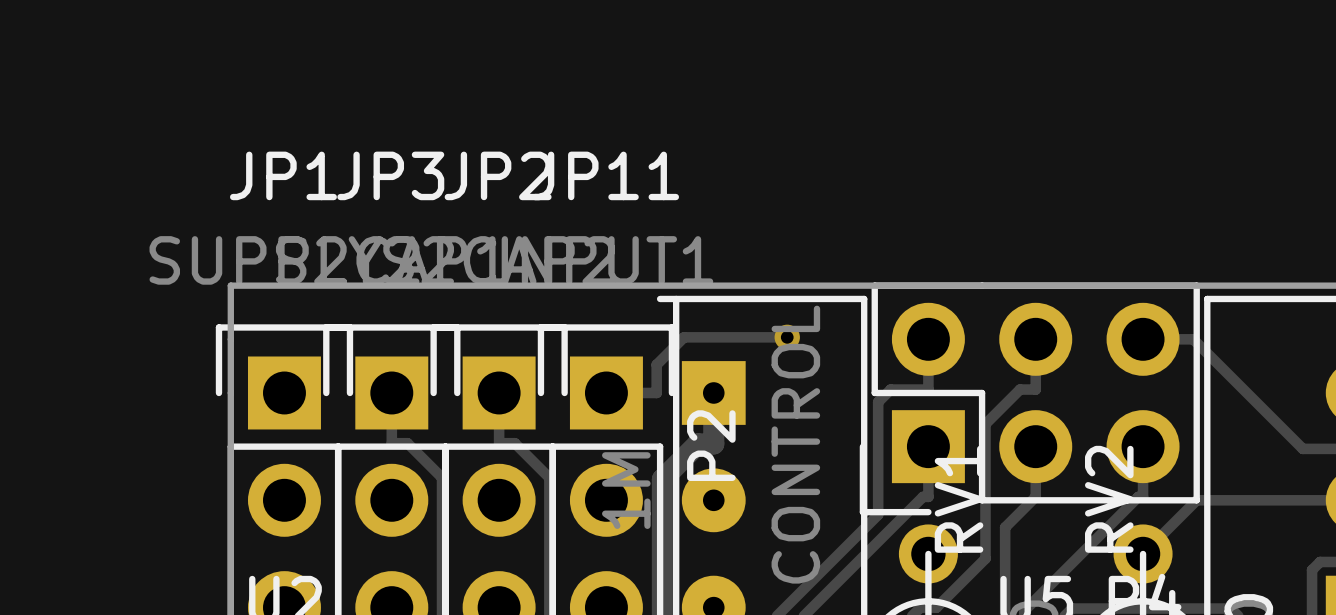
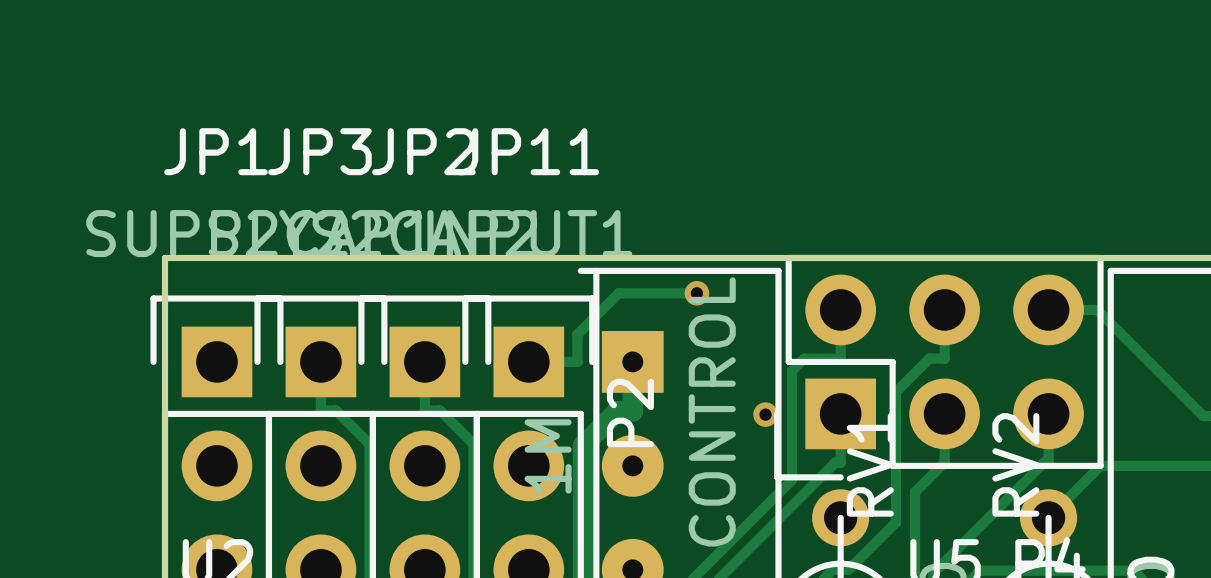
track: (684, 337) (787, 337) -> (603, 308) (618, 293) (696, 293)
via position: (787, 337) -> (696, 293)
via: none -> (765, 414)

